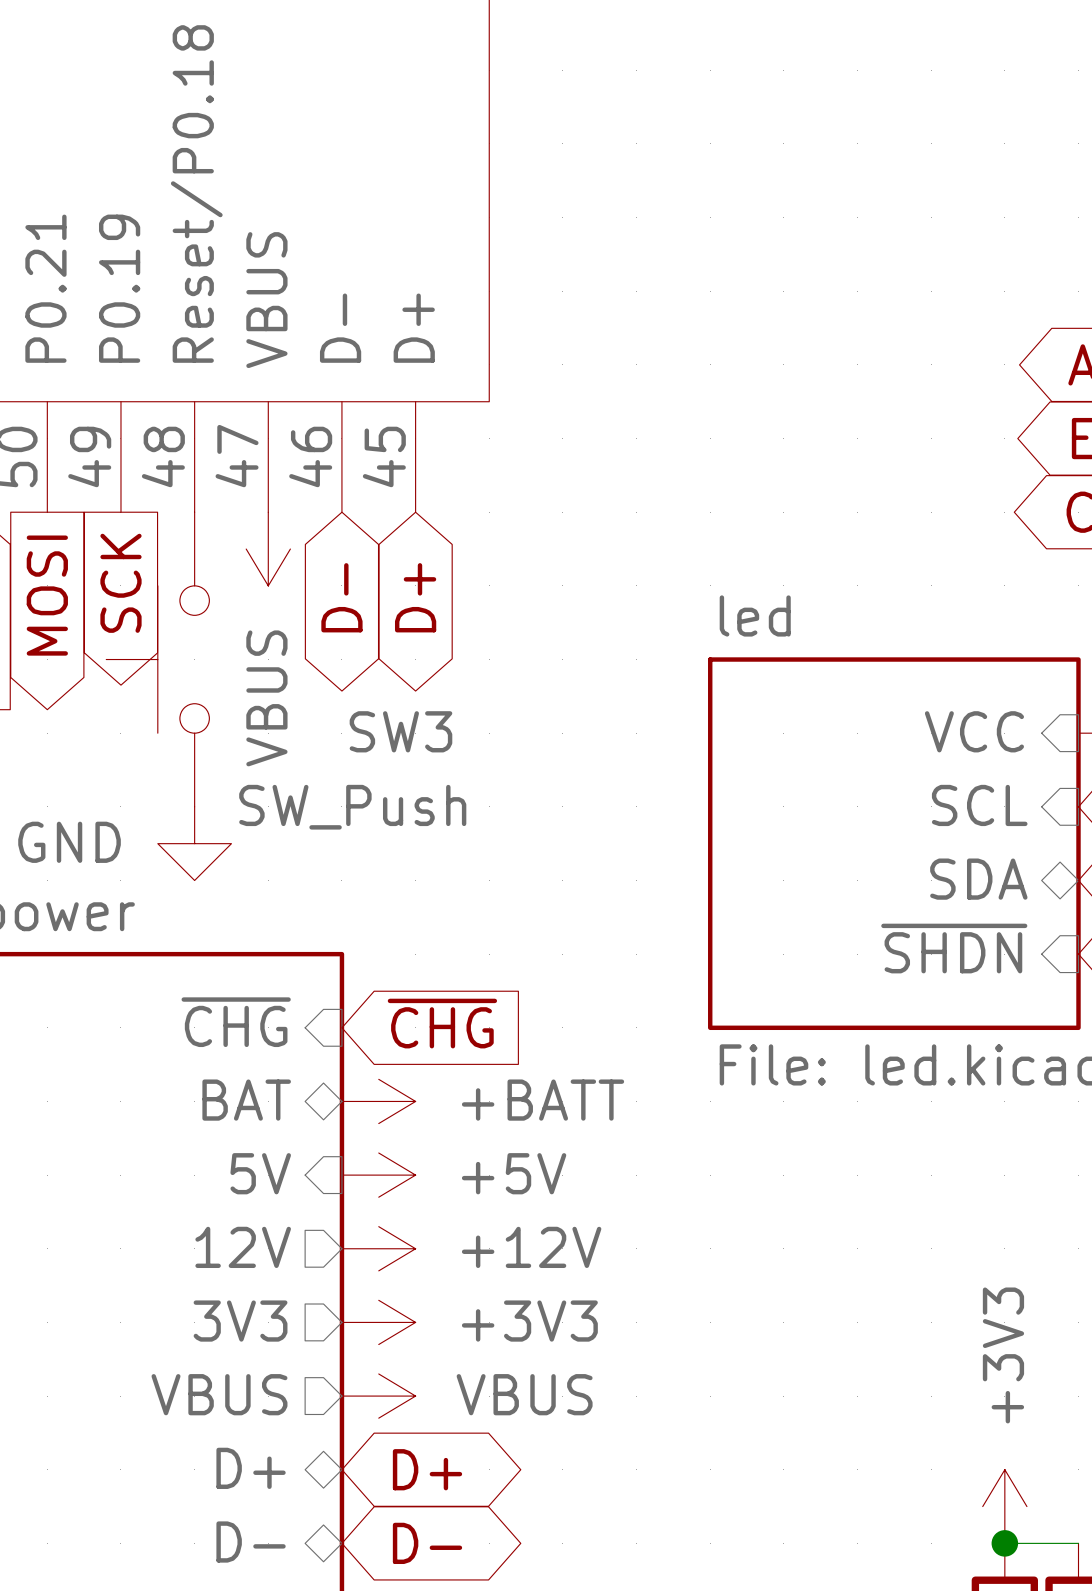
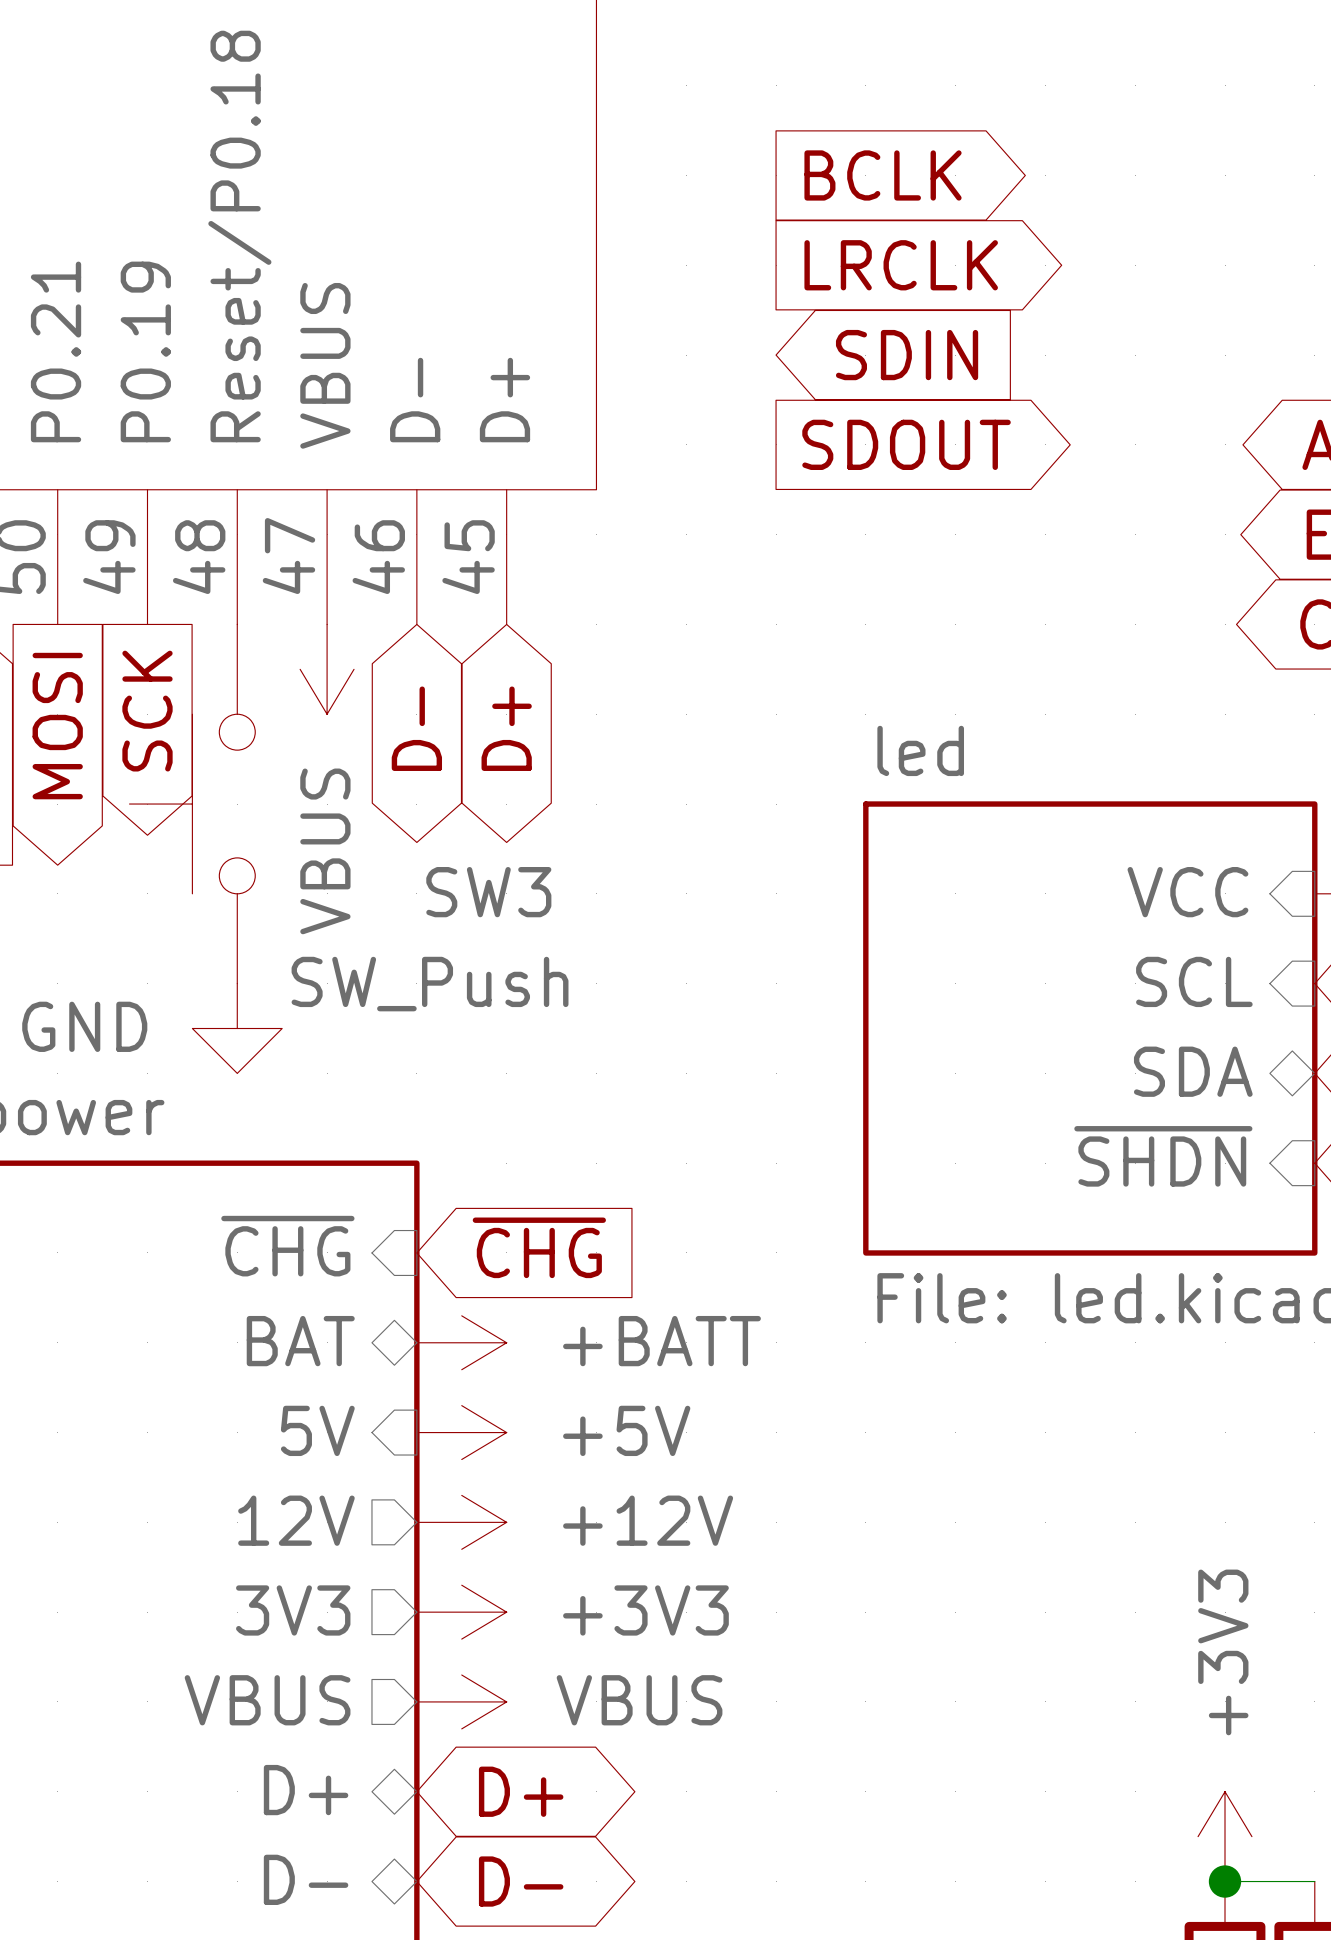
global label: none -> BCLK (883, 175)
global label: none -> LRCLK (901, 265)
global label: none -> SDIN (907, 355)
global label: none -> SDOUT (906, 444)

